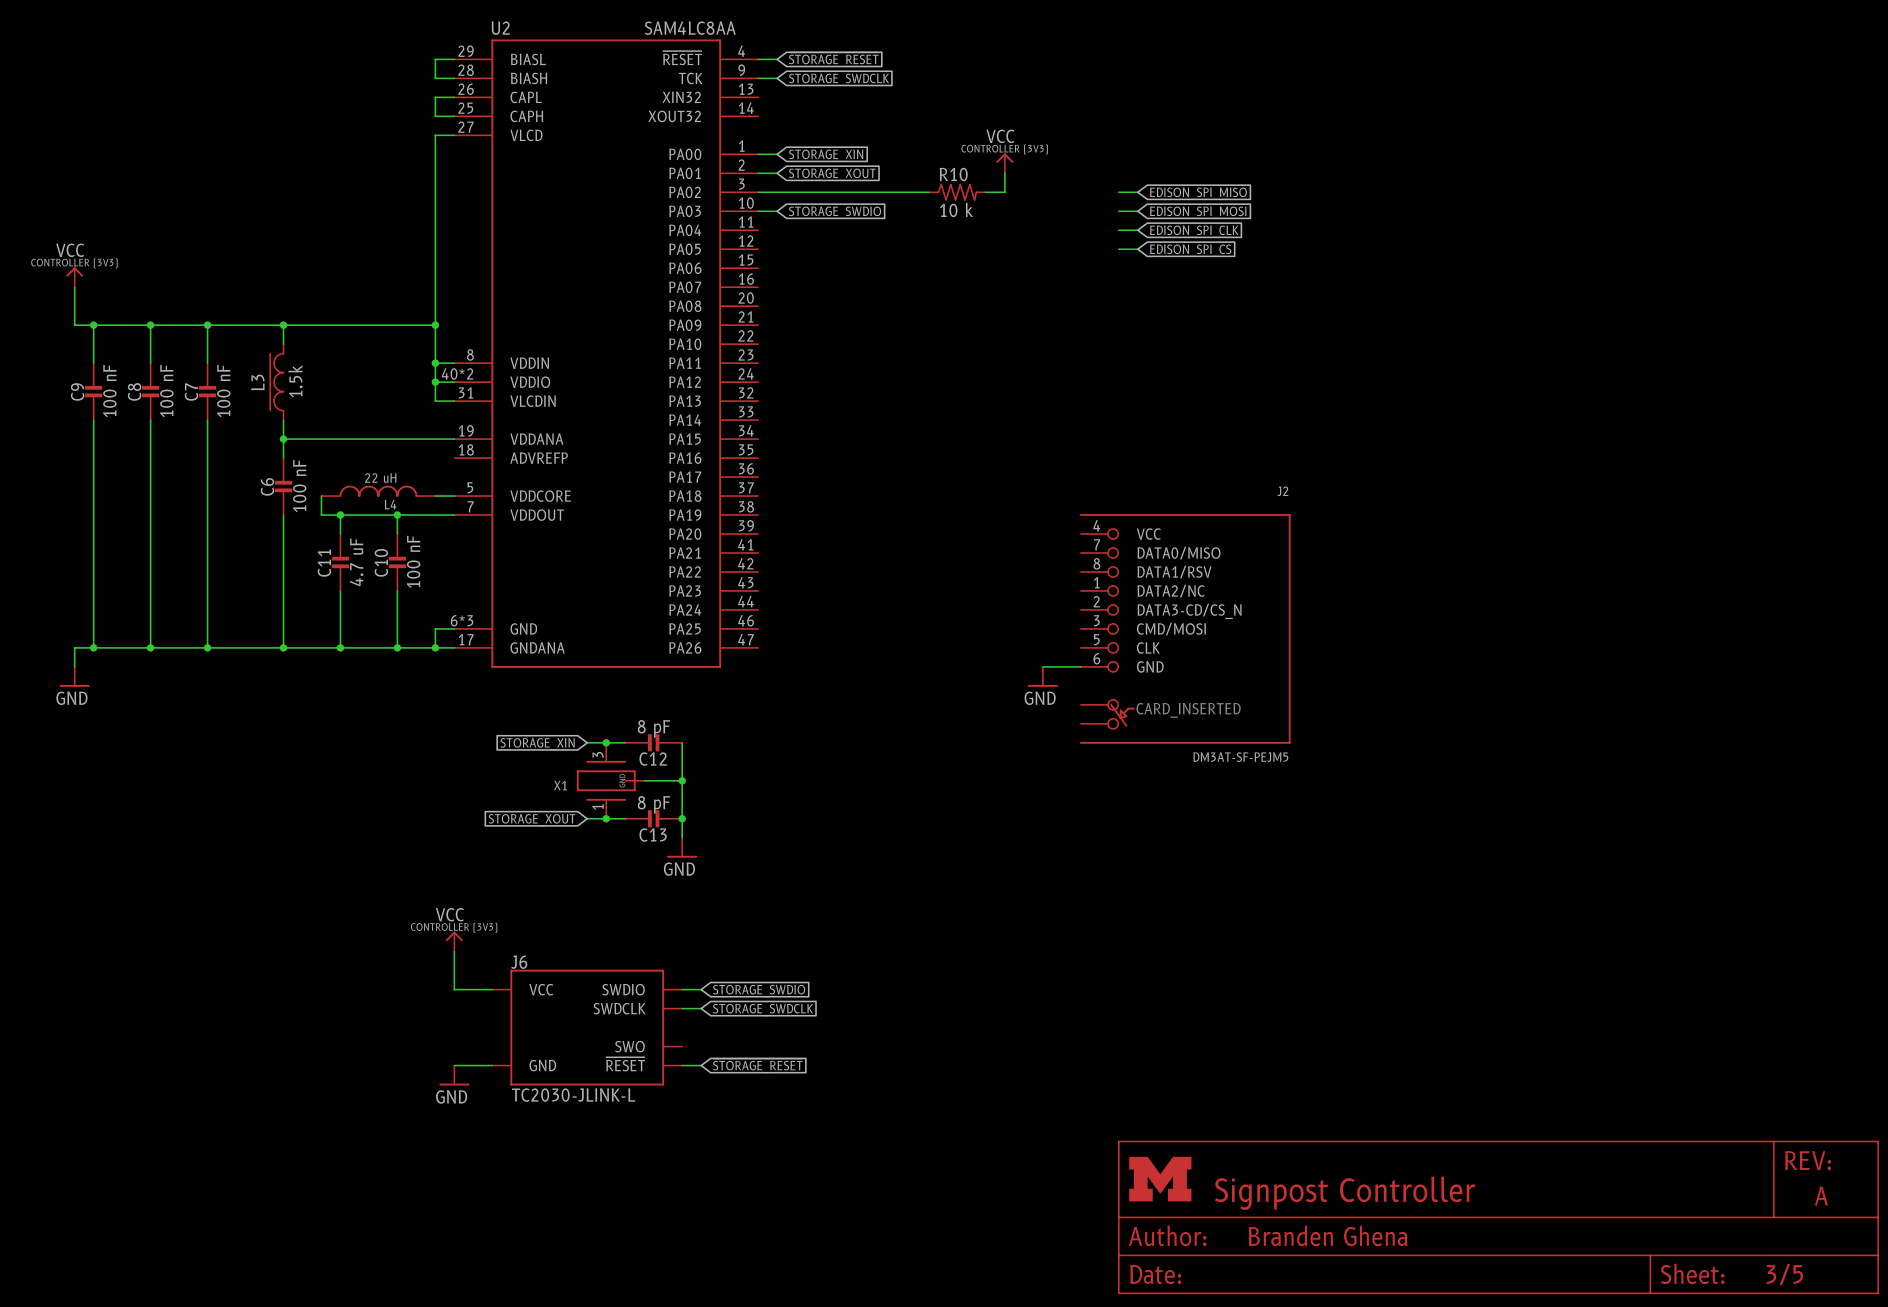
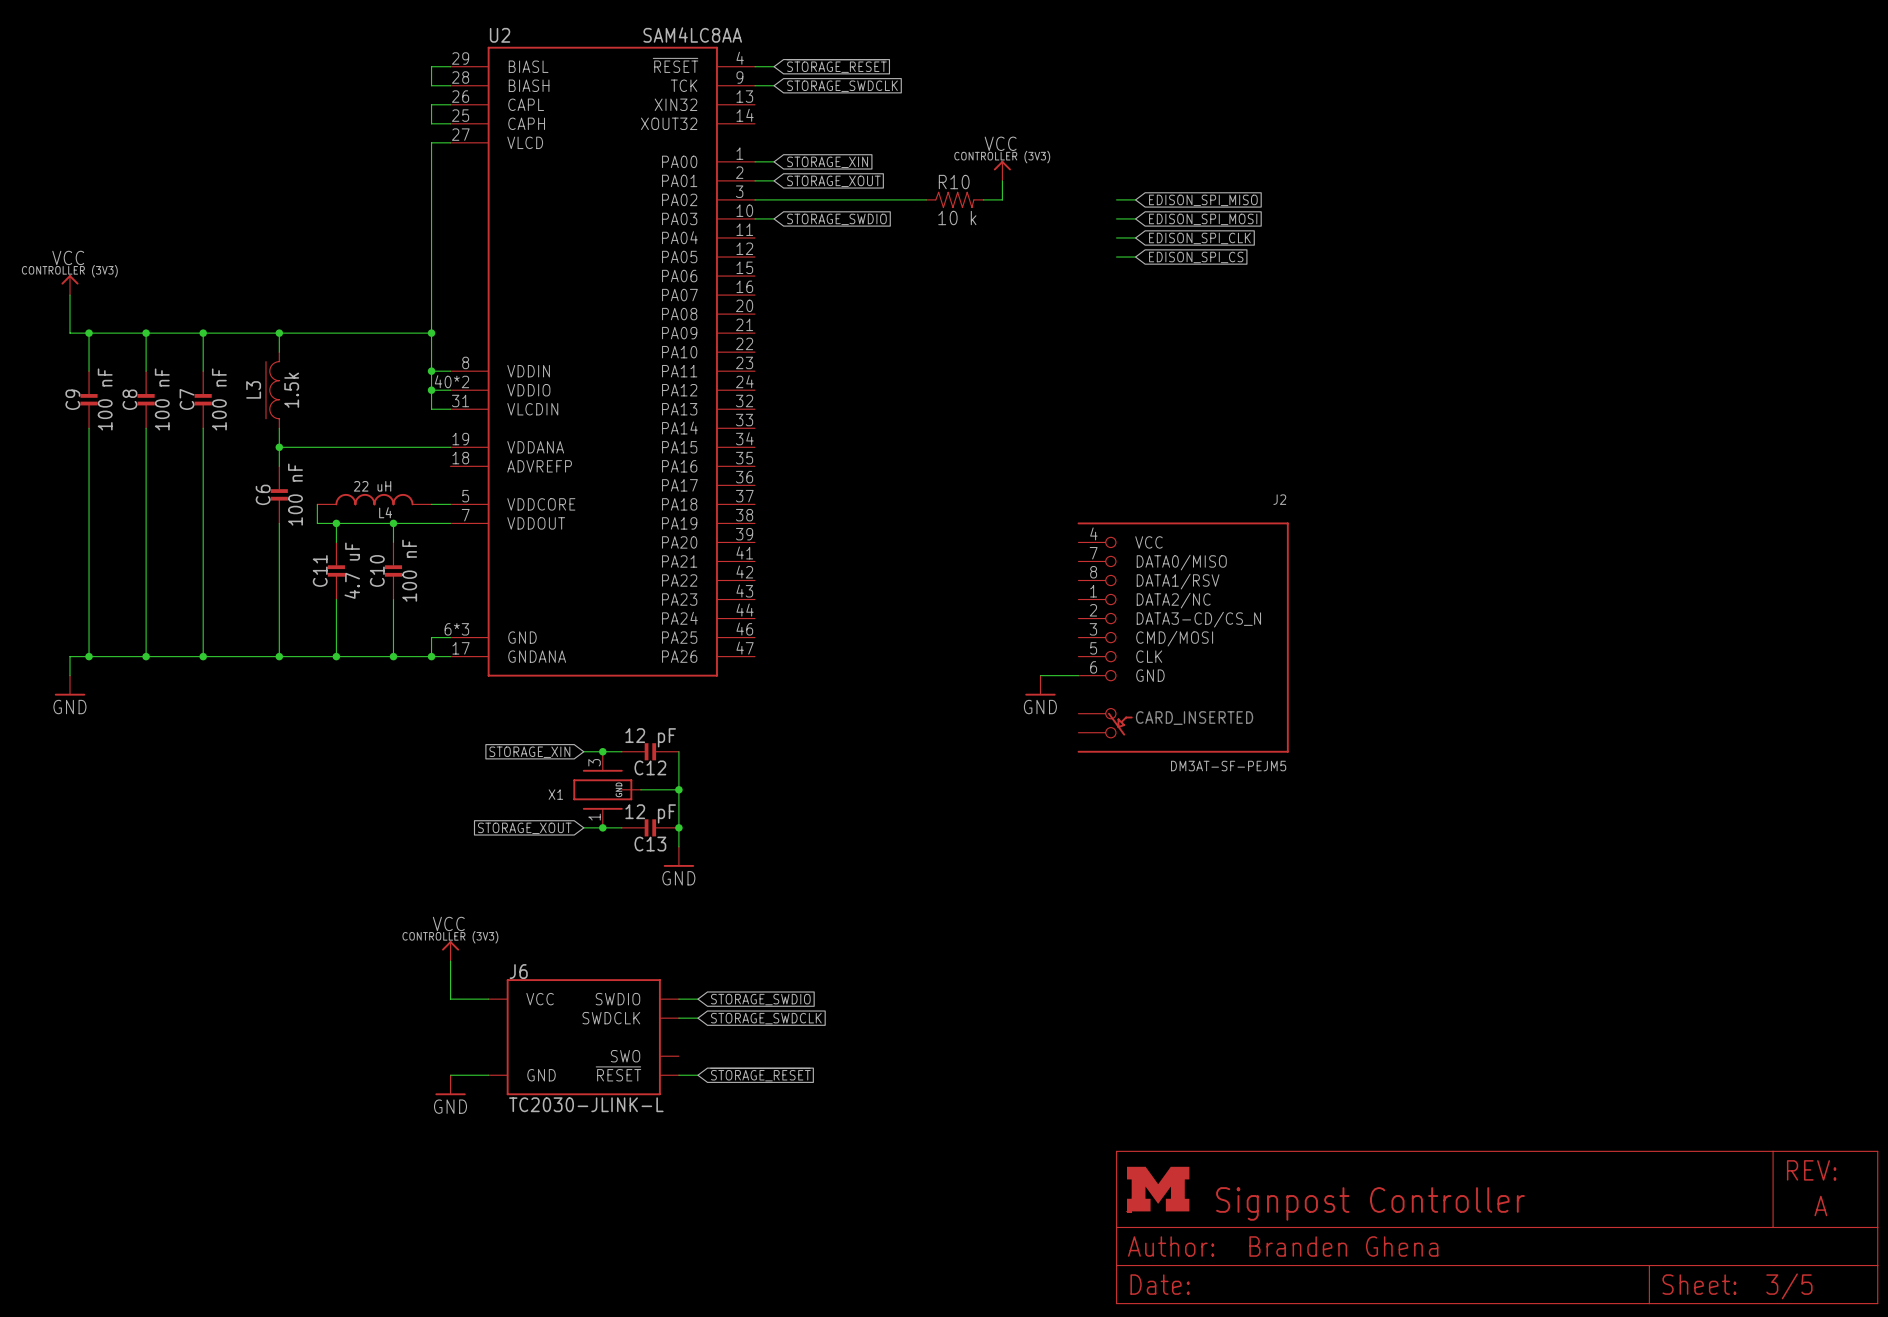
C12 value: 8 pF (653, 728) -> 12 pF (650, 737)
C13 value: 8 pF (653, 804) -> 12 pF (650, 813)

